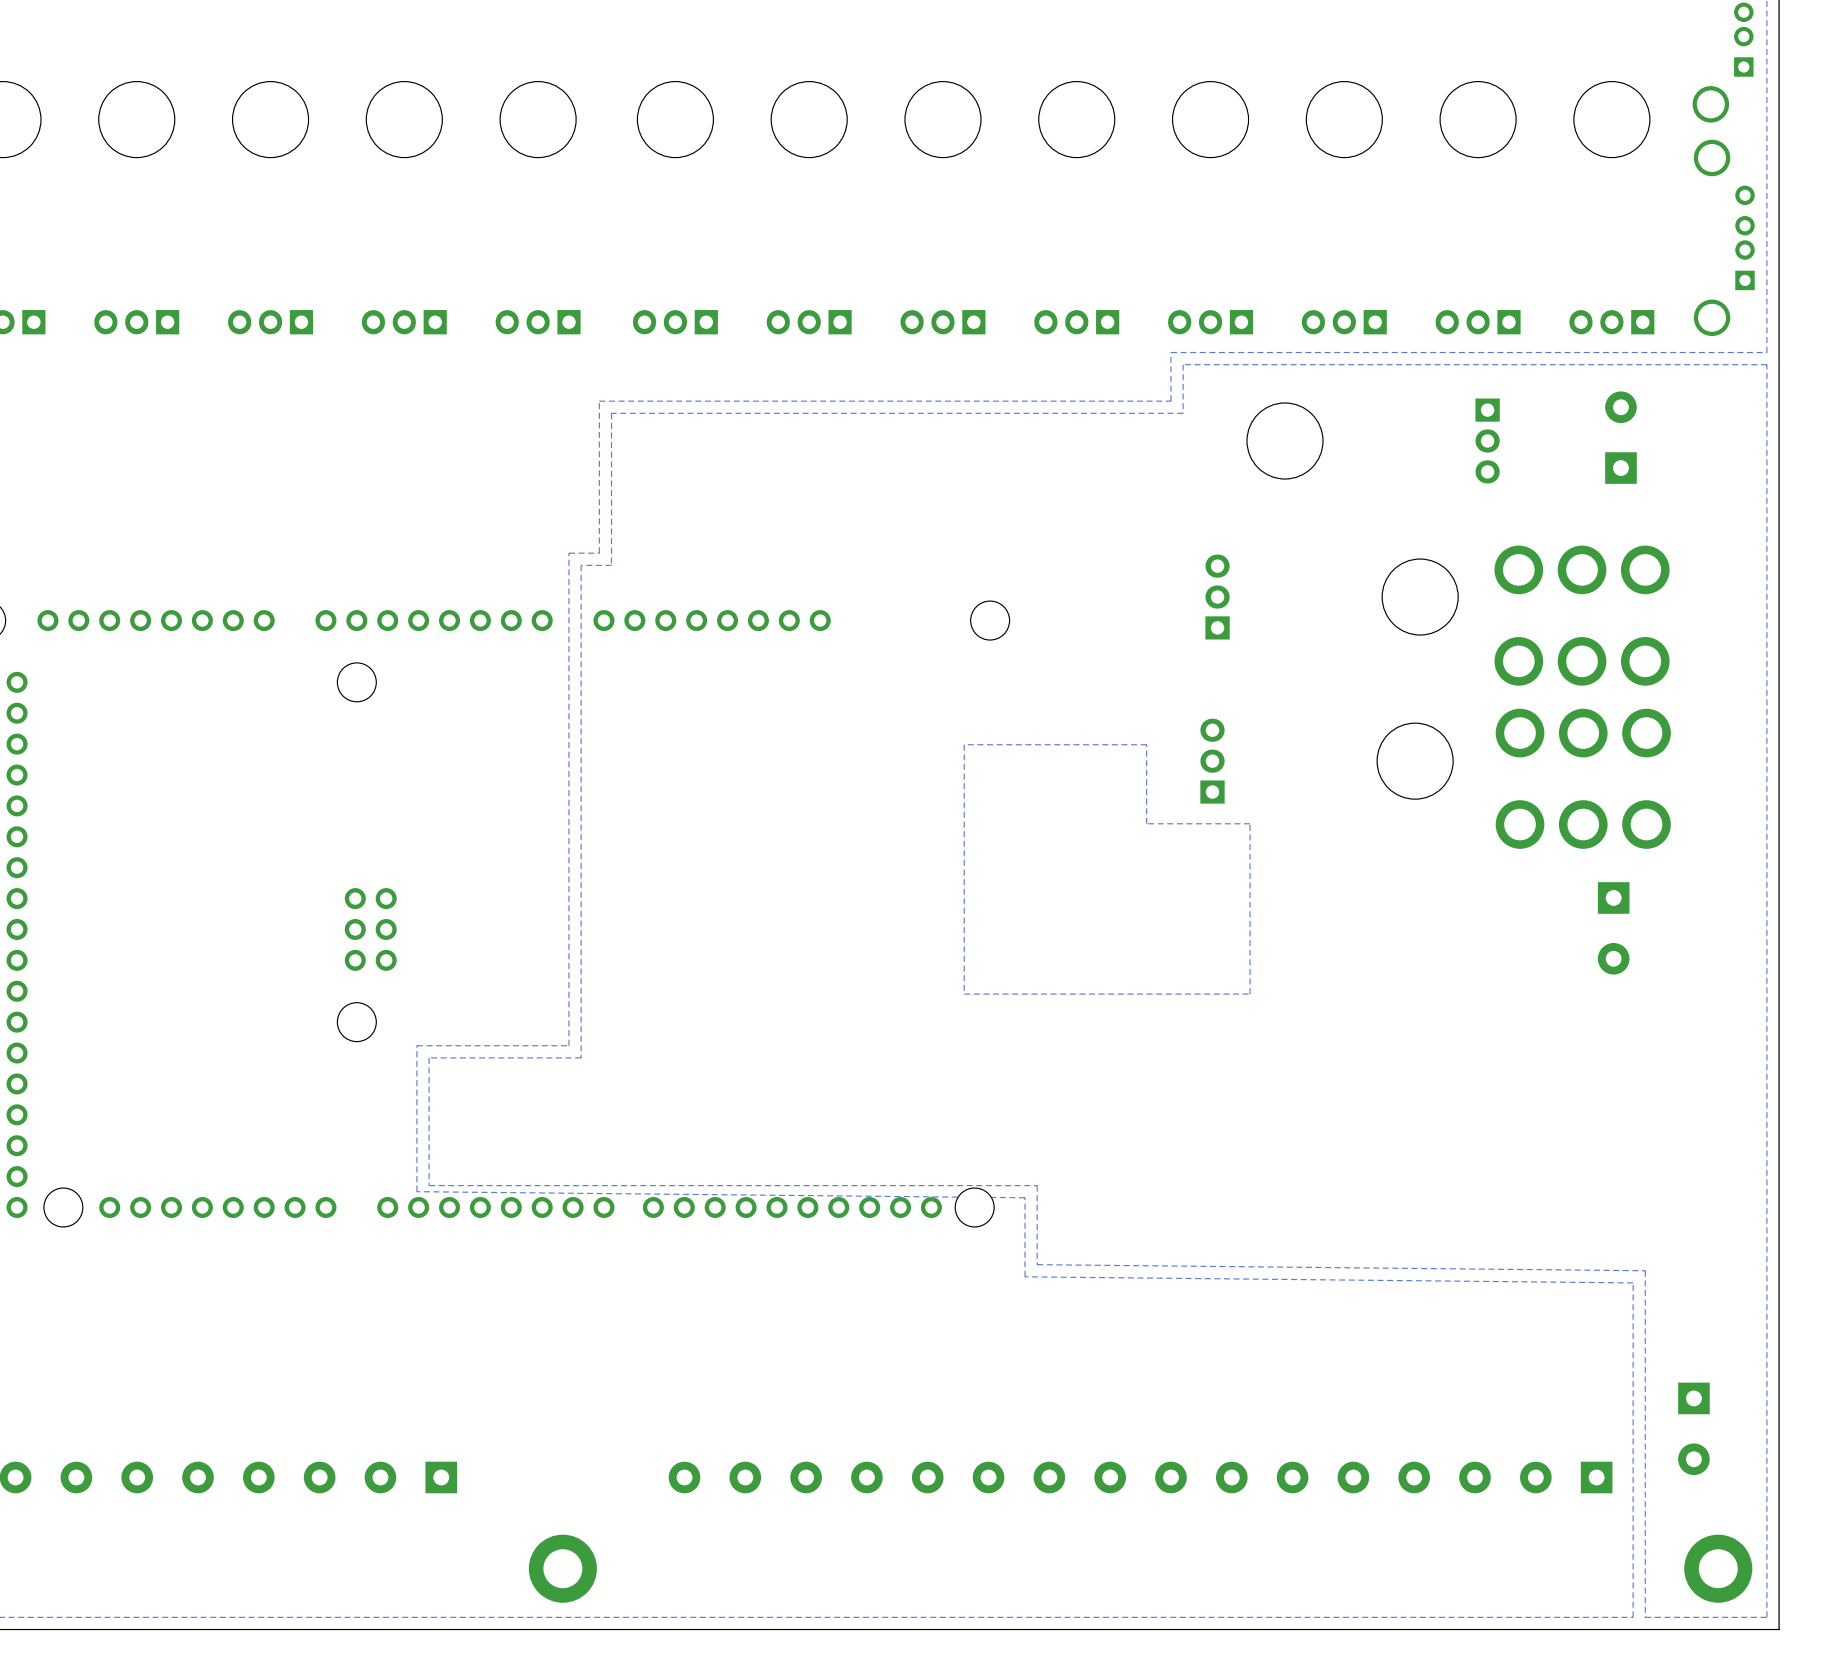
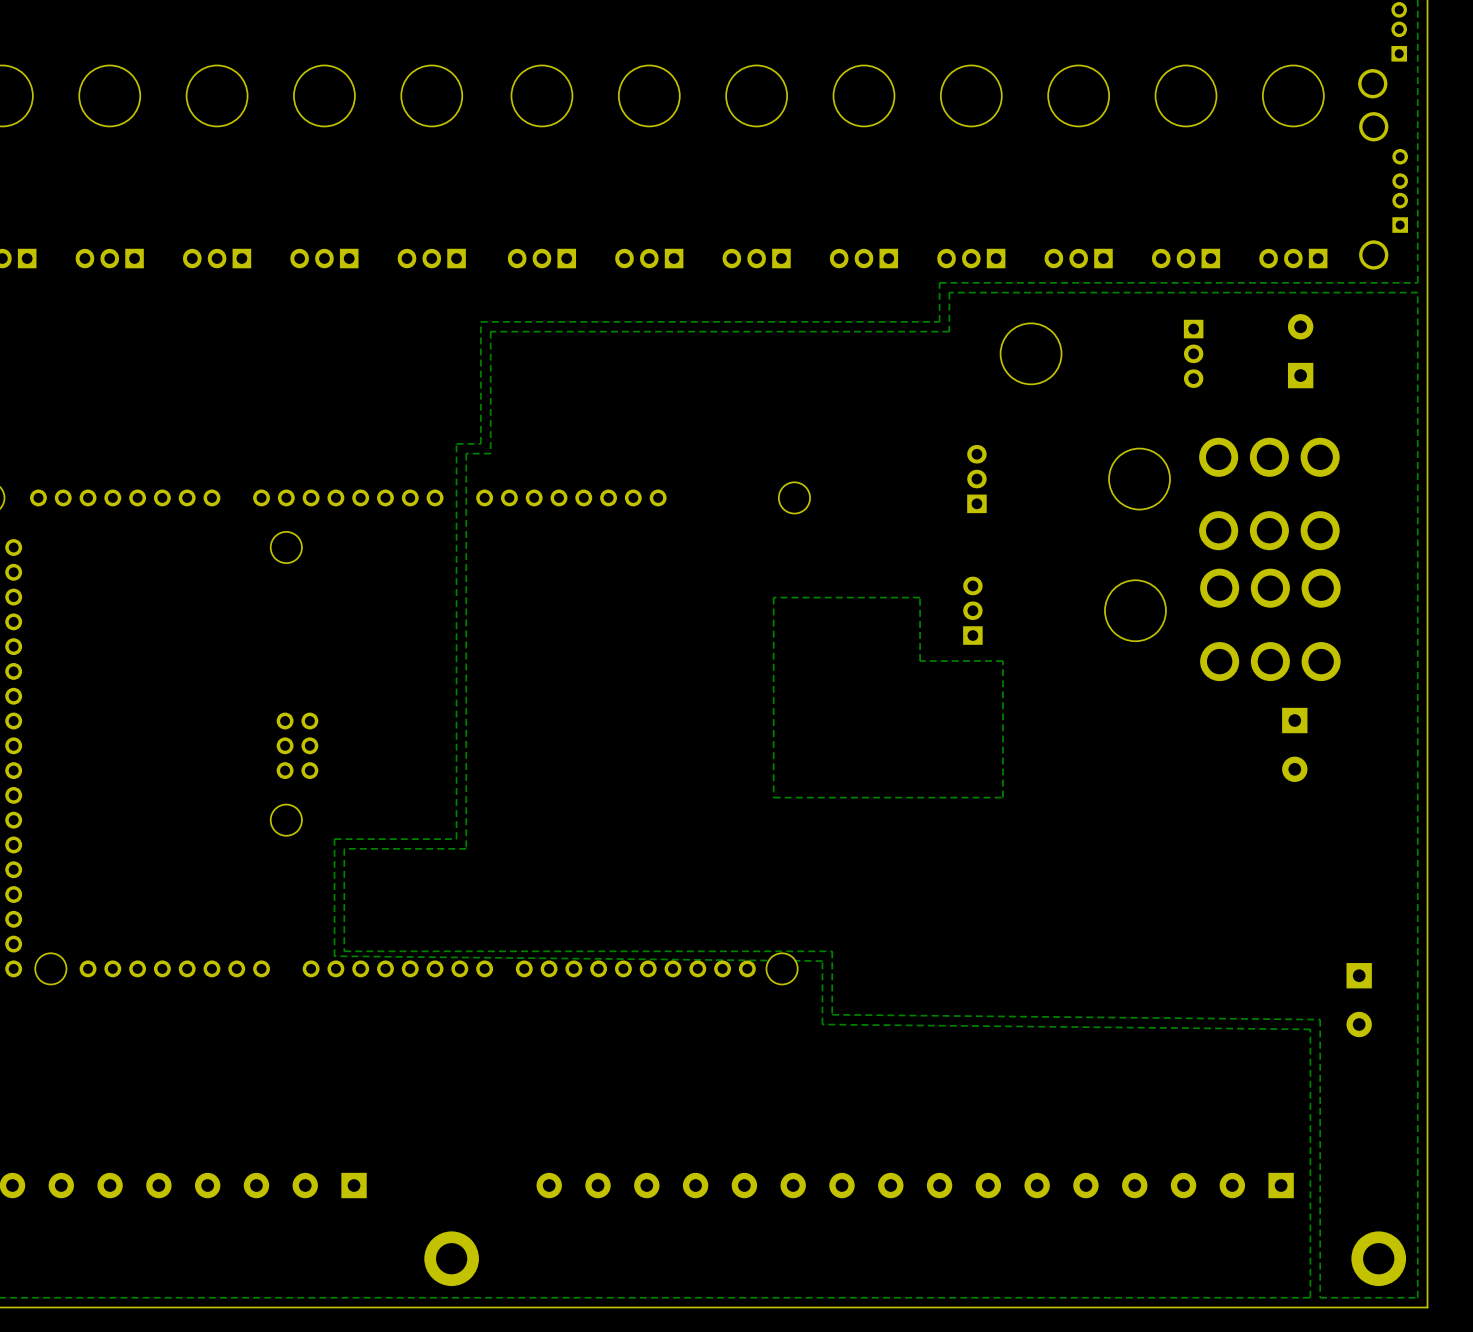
part position: (1693, 1428) -> (1359, 1000)

